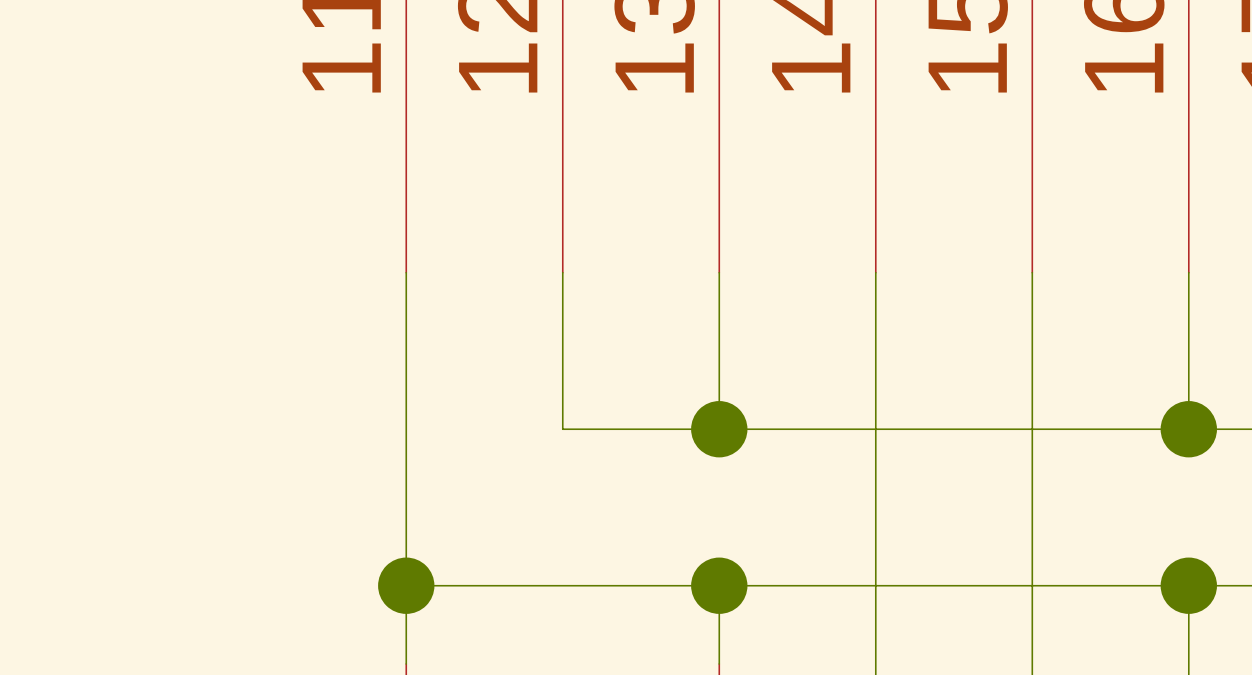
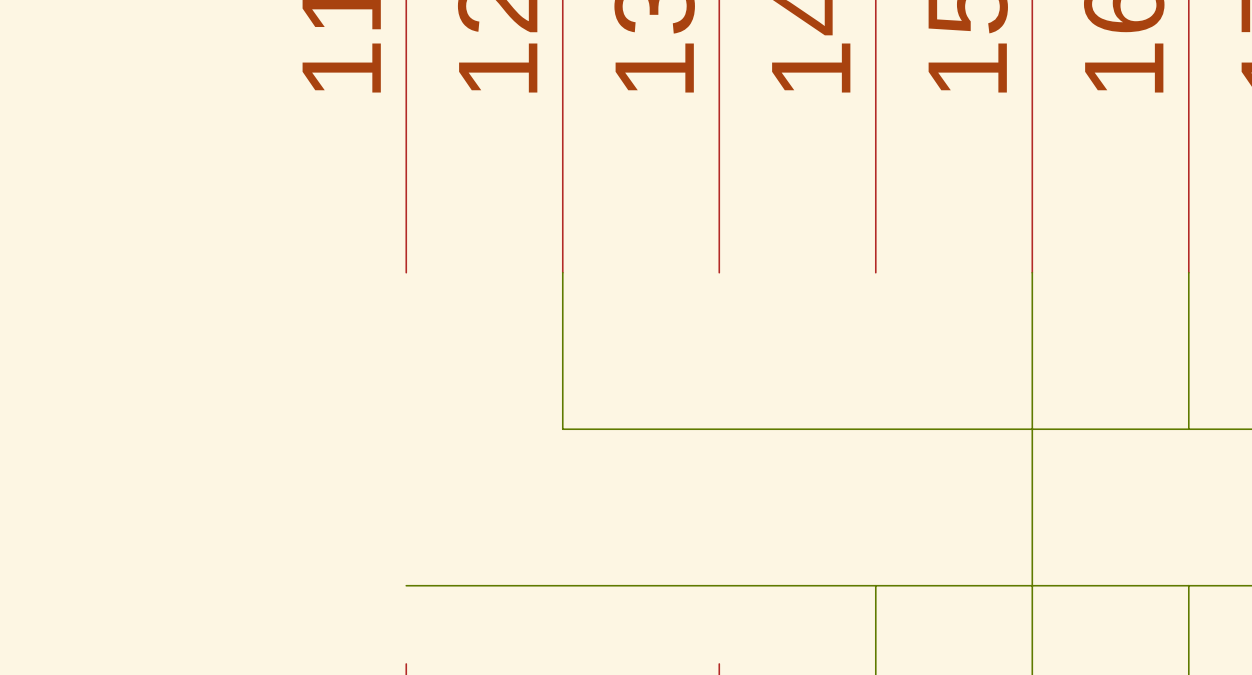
wire: (406, 272) (406, 663) -> none
wire: (719, 272) (719, 429) -> none
wire: (875, 272) (875, 585) -> none
junction: (719, 429) -> none
junction: (1188, 429) -> none
junction: (406, 585) -> none
wire: (719, 585) (719, 663) -> none
junction: (719, 585) -> none
junction: (1188, 585) -> none

